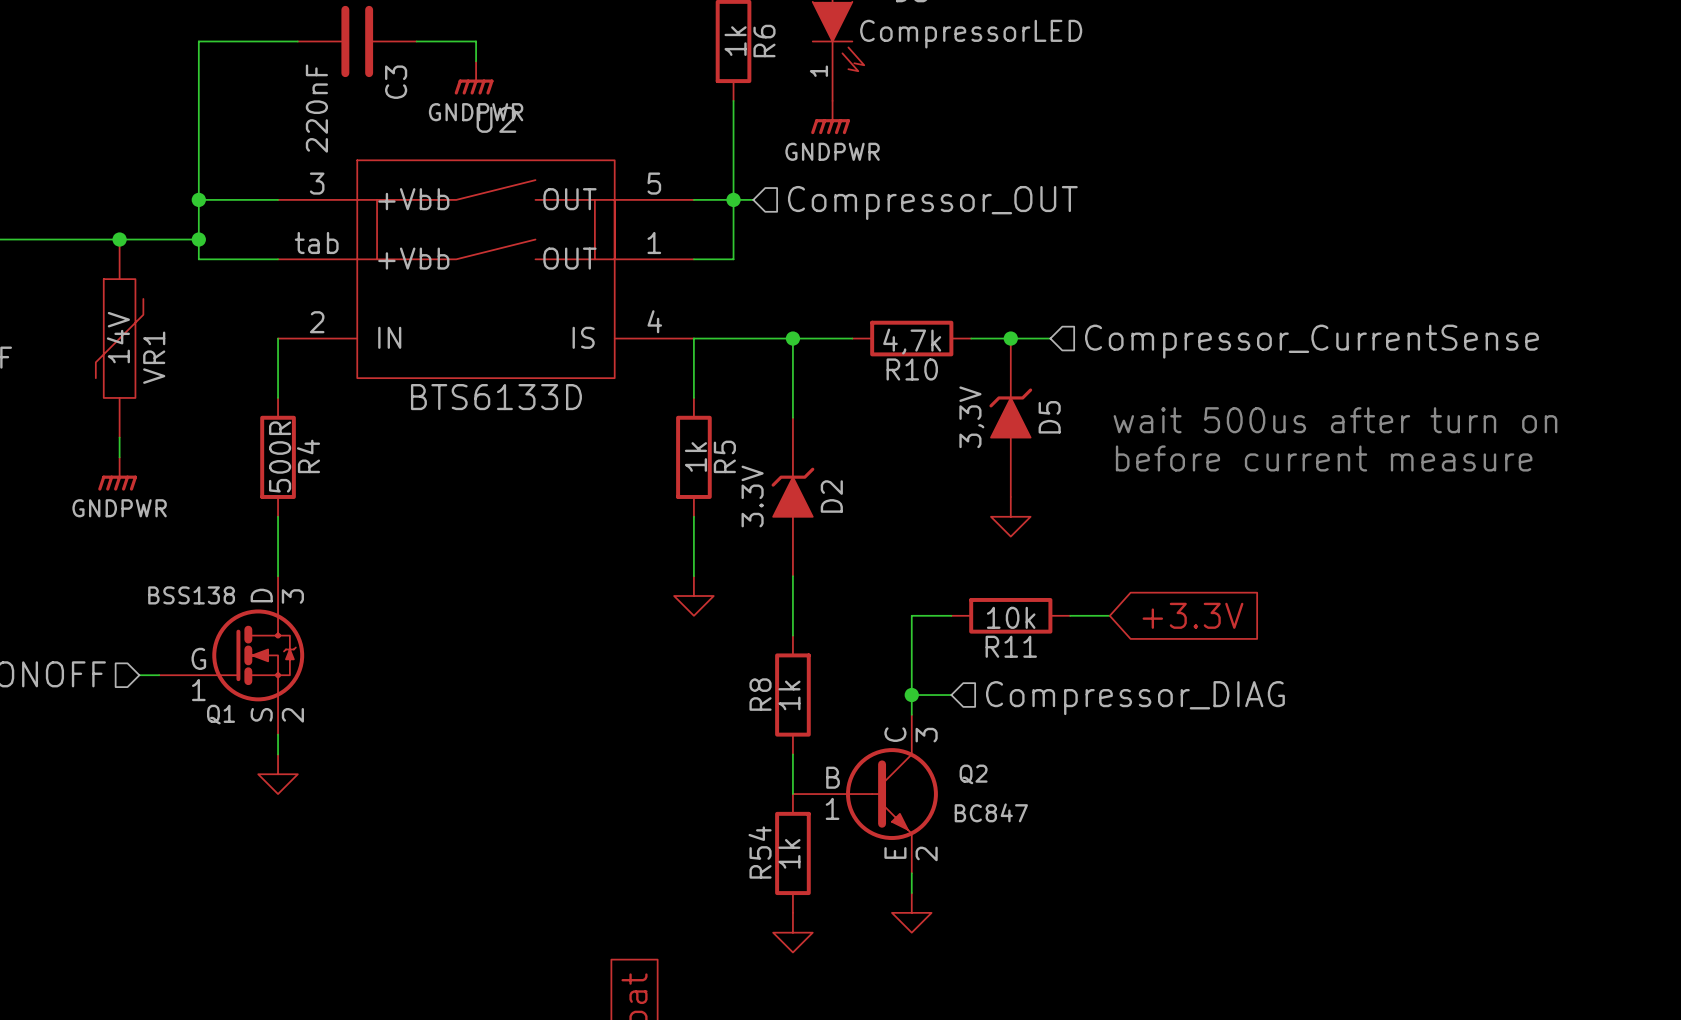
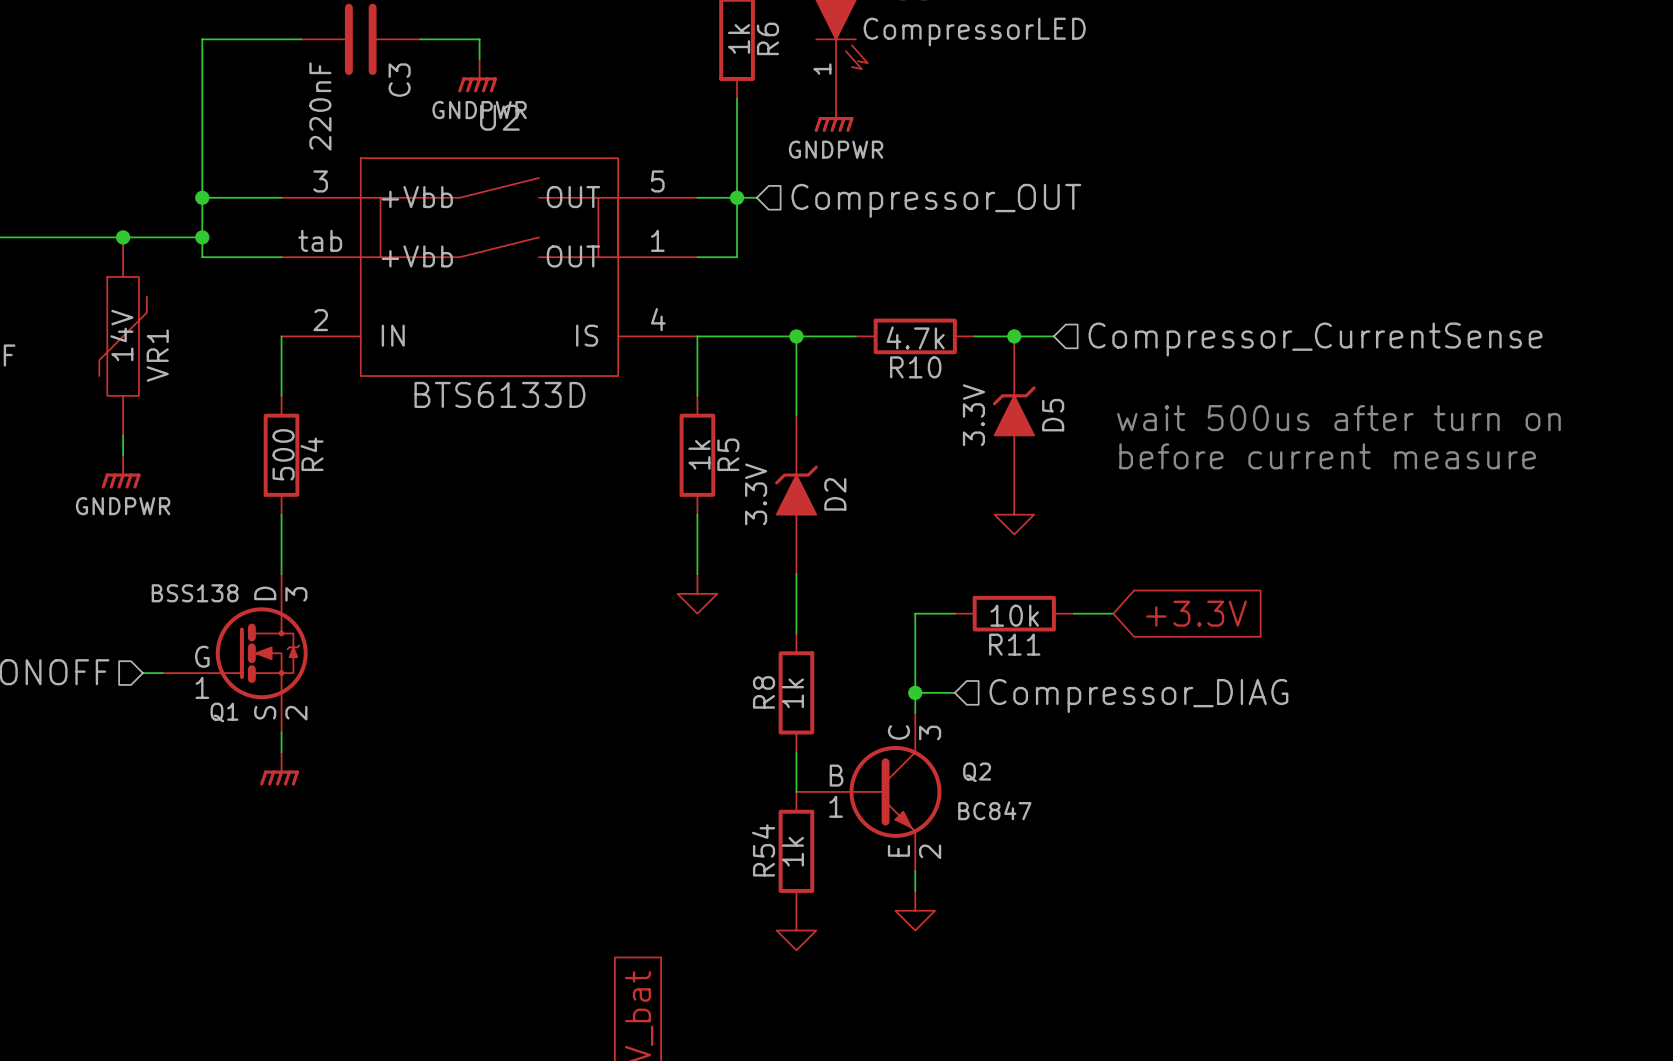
R10 value: 4,7k (912, 341) -> 4.7k (915, 337)
D5 value: 3,3V (971, 417) -> 3.3V (973, 415)
R4 value: 500R (280, 456) -> 500 (283, 454)
power symbol shape: [258, 754, 298, 795] -> [260, 752, 299, 786]

